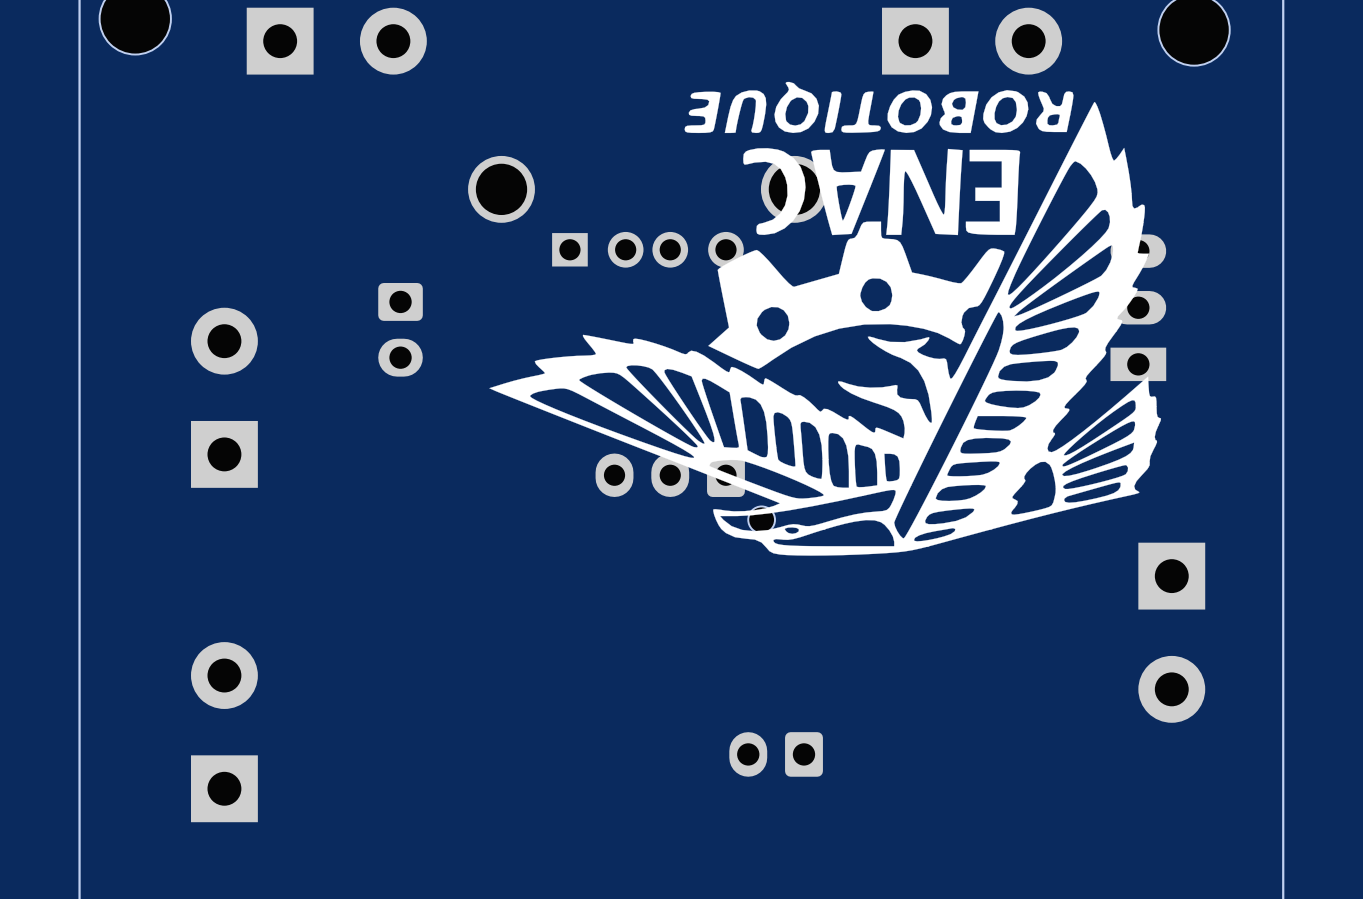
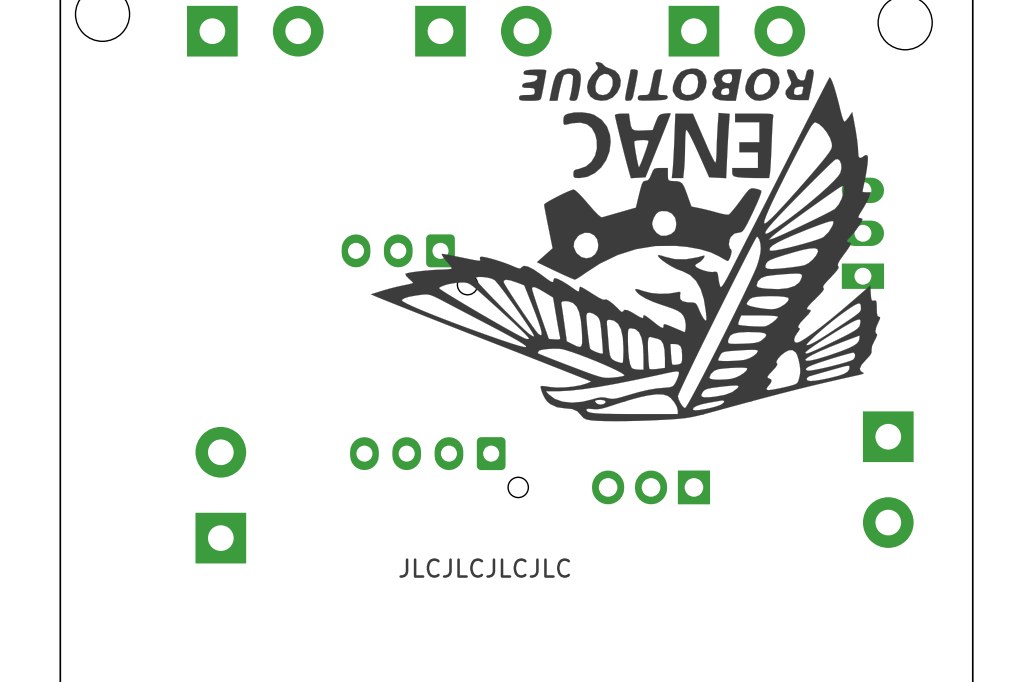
part: none -> (483, 31)
part: (647, 211) -> none
part: (400, 329) -> none
part: (224, 397) -> none
part position: (685, 493) -> (409, 264)
part: none -> (439, 467)
part: none -> (651, 487)
part position: (224, 732) -> (220, 495)
text: none -> JLCJLCJLCJLC (484, 568)
part: (776, 754) -> none

